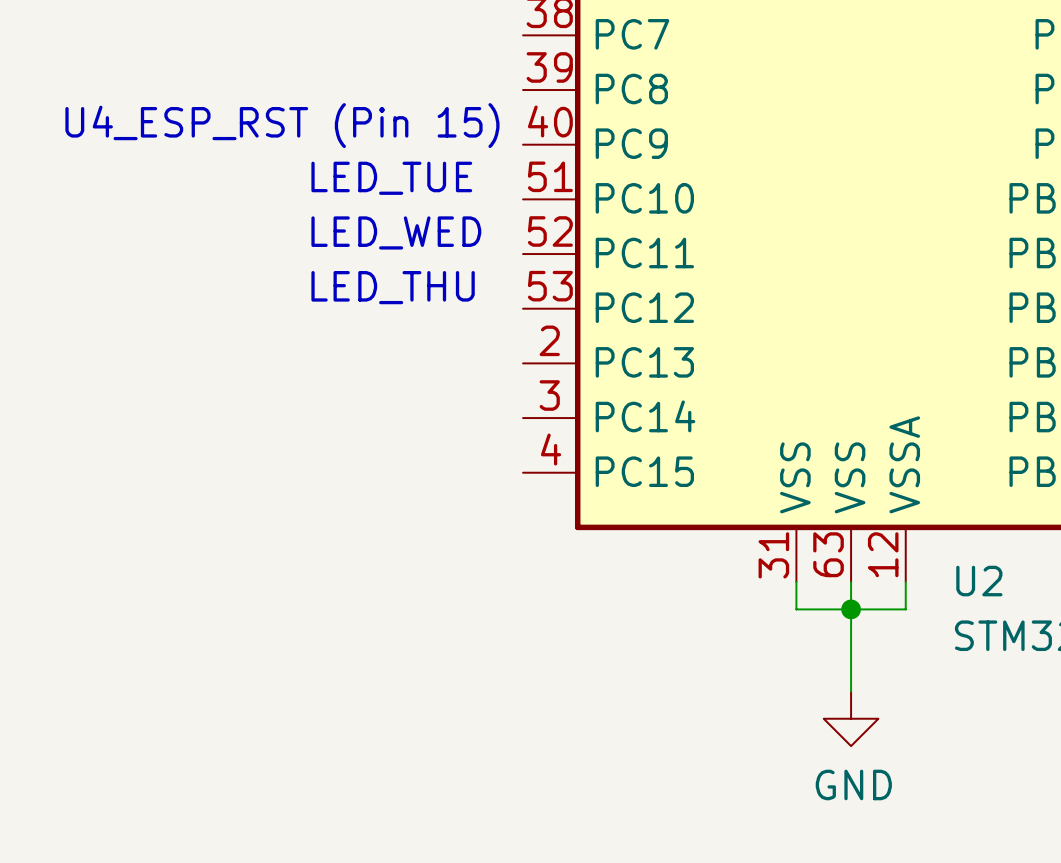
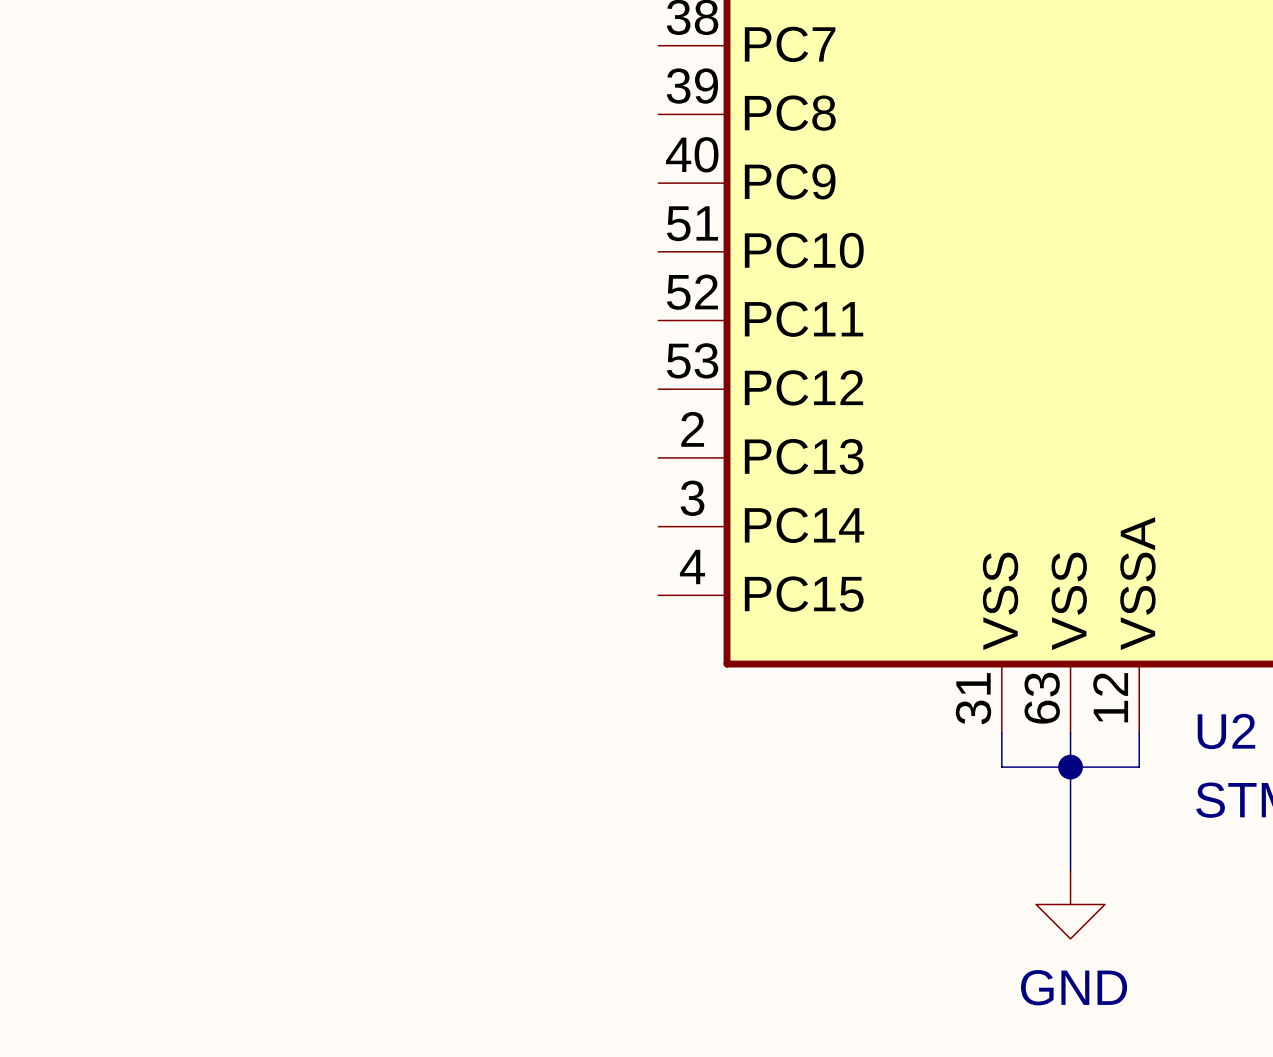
text: U4_ESP_RST (Pin 15) (282, 125) -> none
text: LED_TUE (391, 178) -> none
text: LED_WED (396, 232) -> none
text: LED_THU (393, 287) -> none

